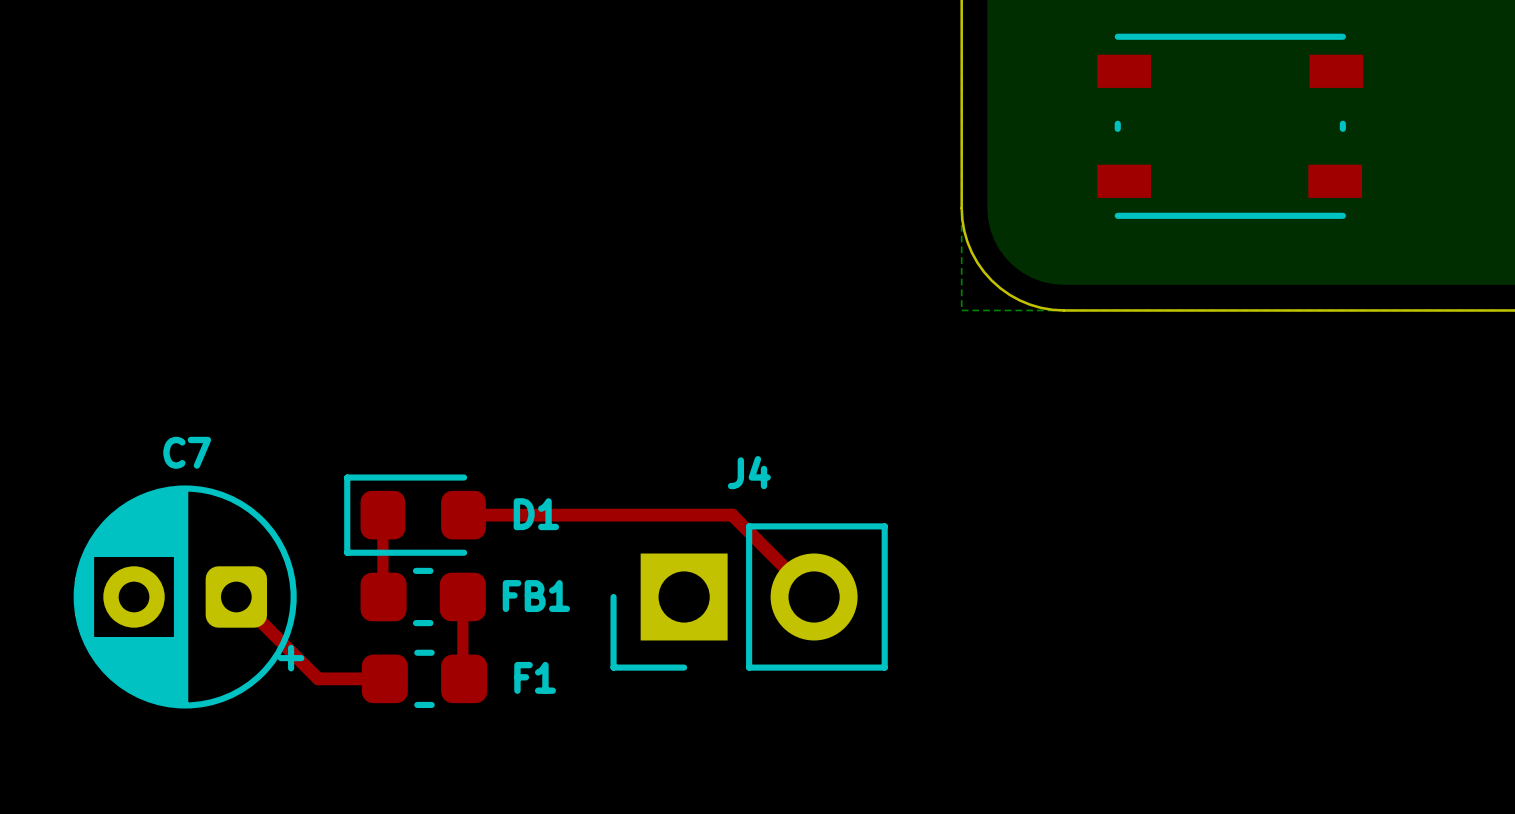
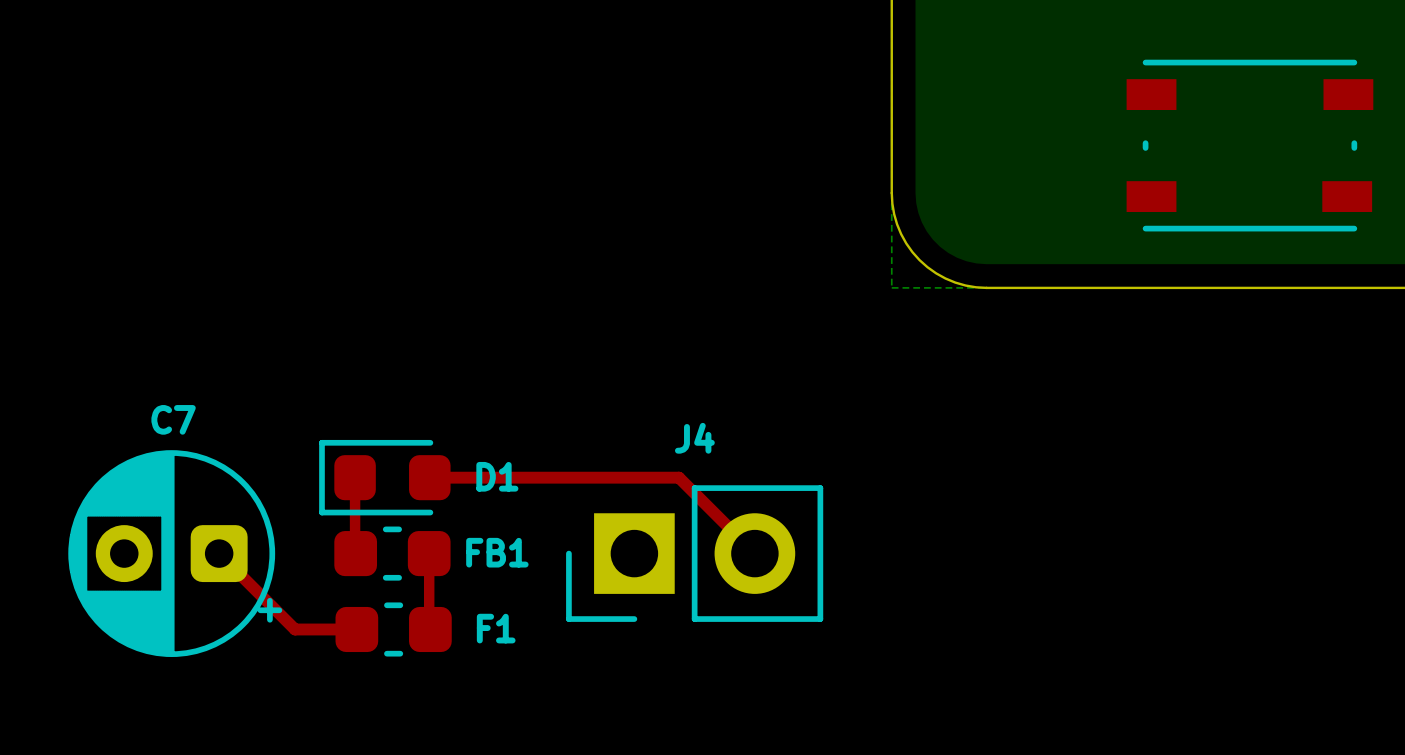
part position: (1230, 126) -> (1249, 145)

